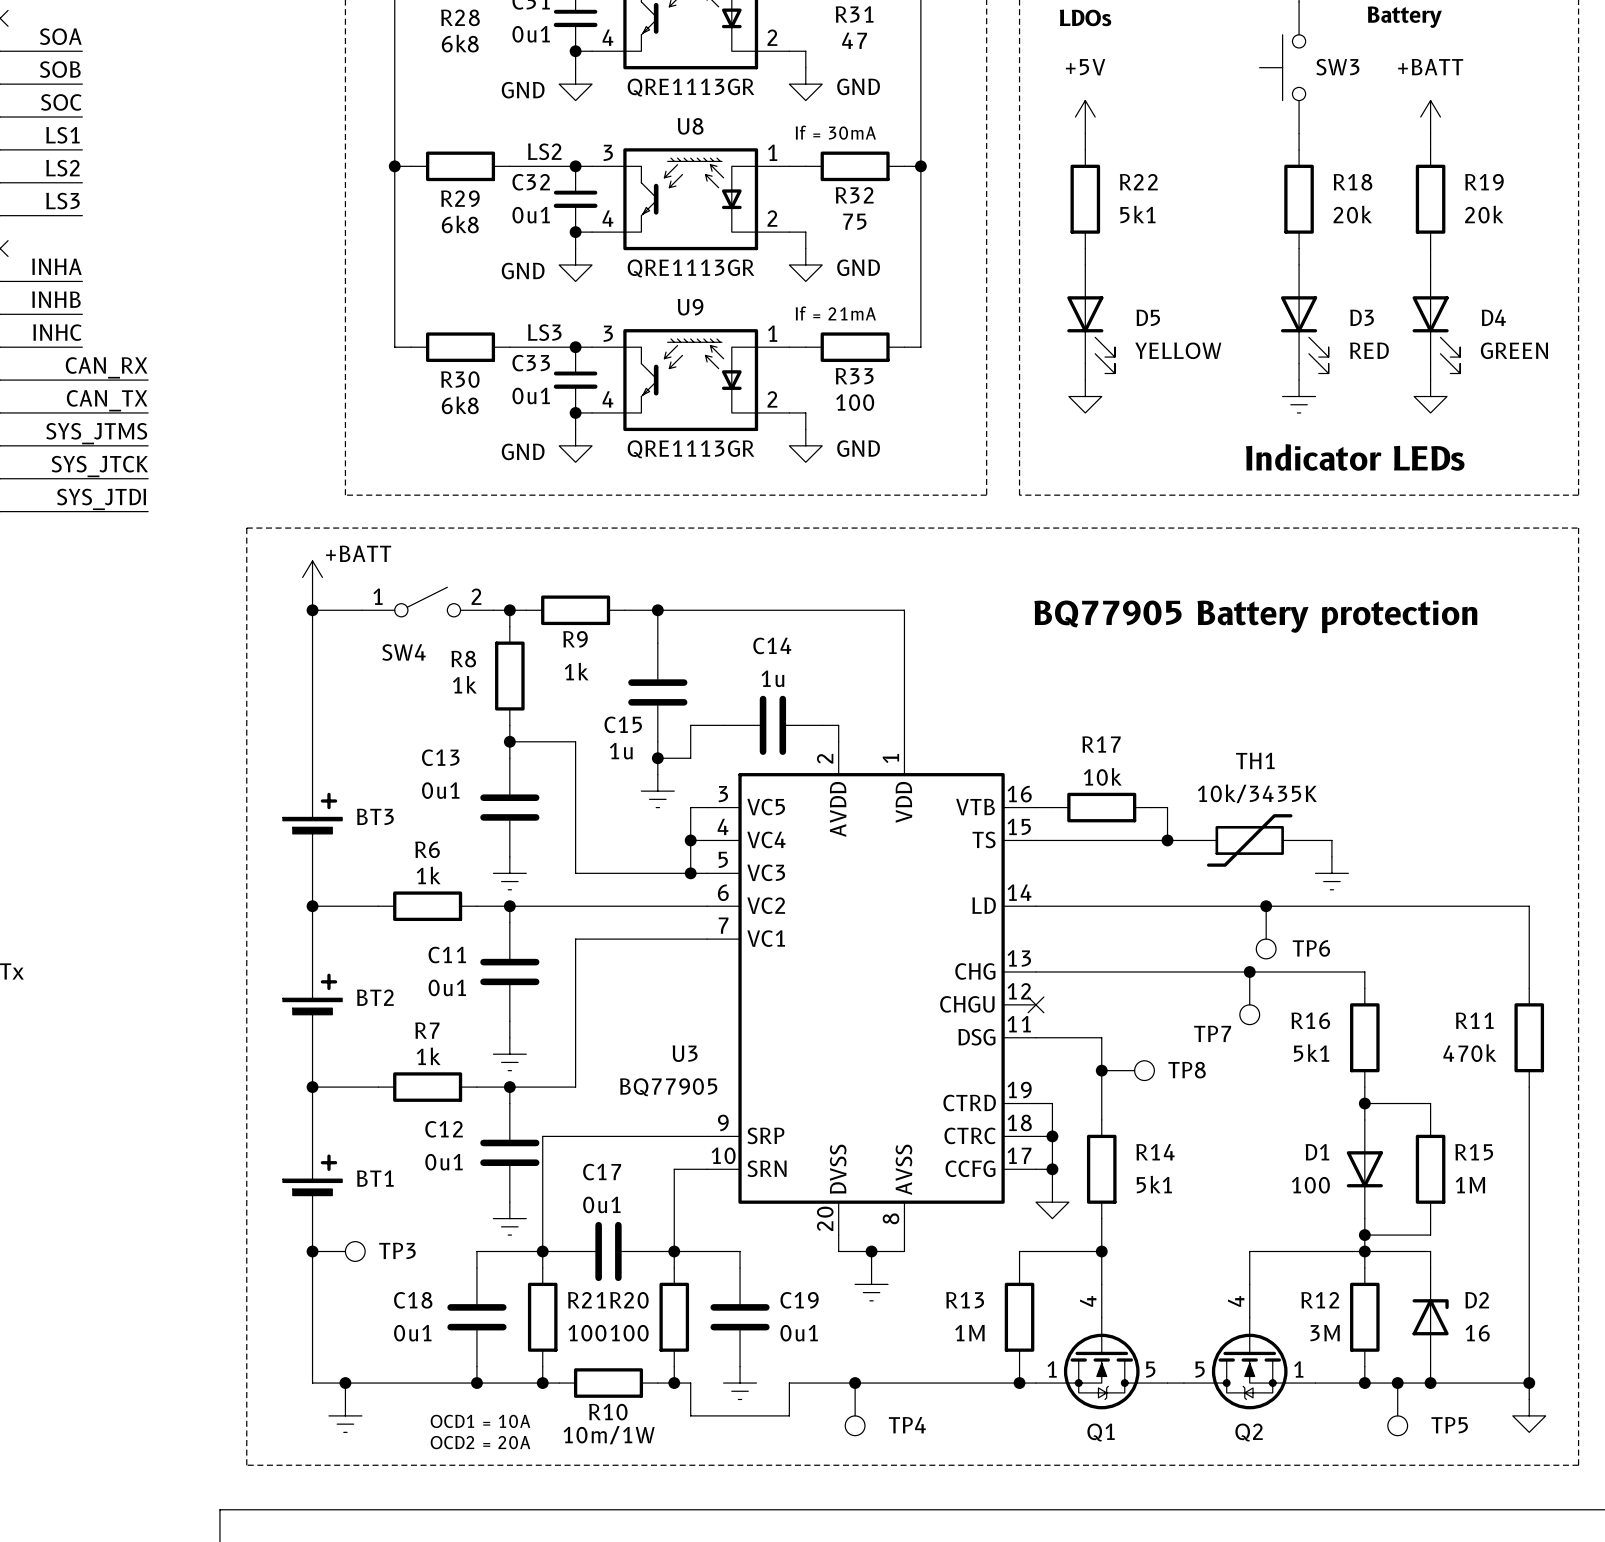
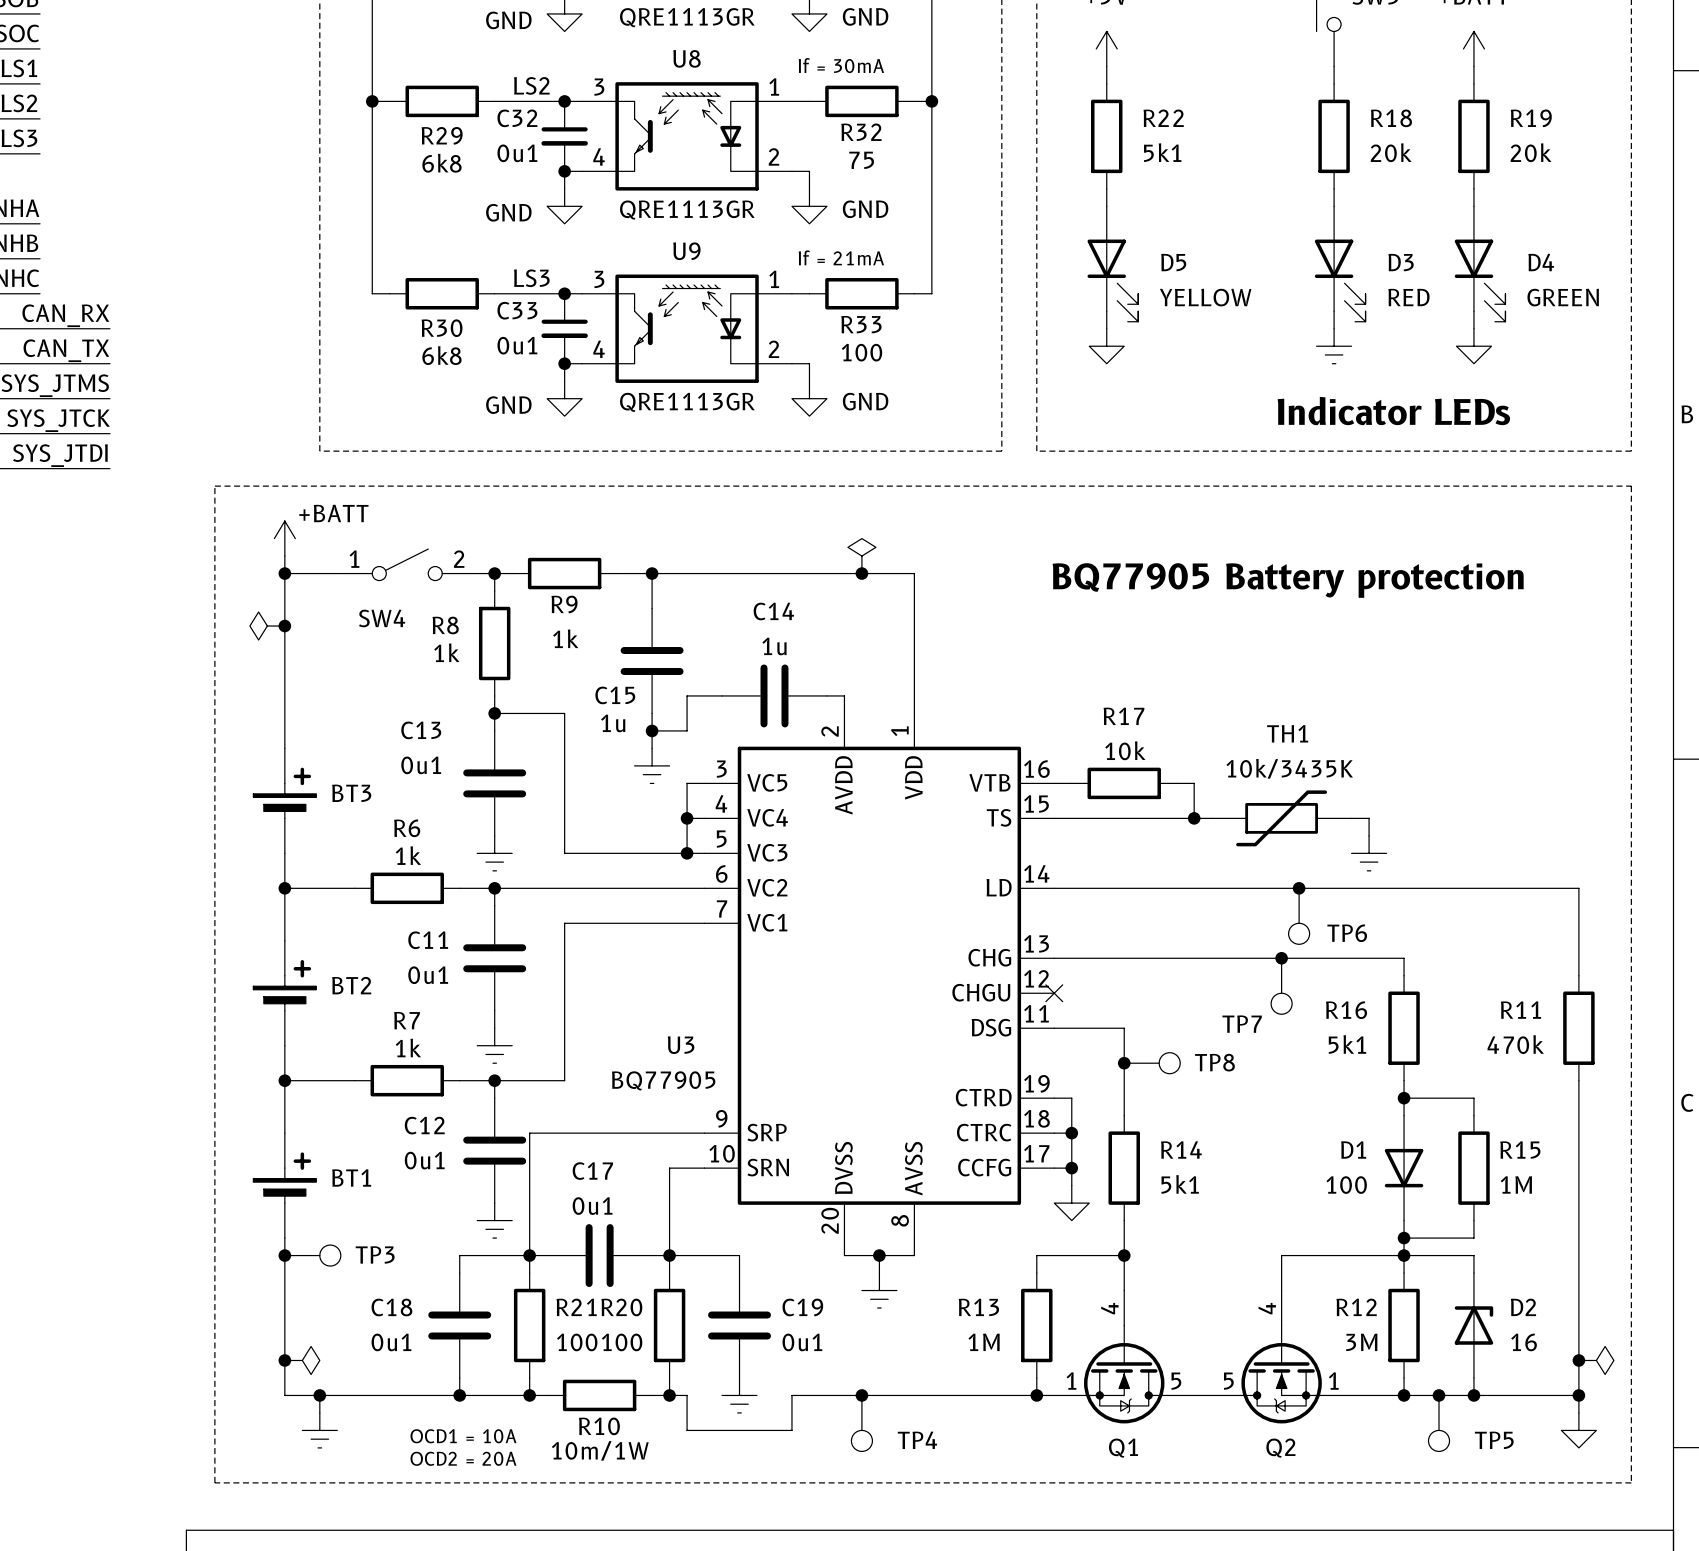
power symbol: none -> (861, 556)
junction: none -> (861, 573)
power symbol: none -> (267, 626)
junction: none -> (284, 626)
junction: none -> (284, 1360)
power symbol: none -> (302, 1360)
junction: none -> (1578, 1360)
power symbol: none -> (1596, 1360)

